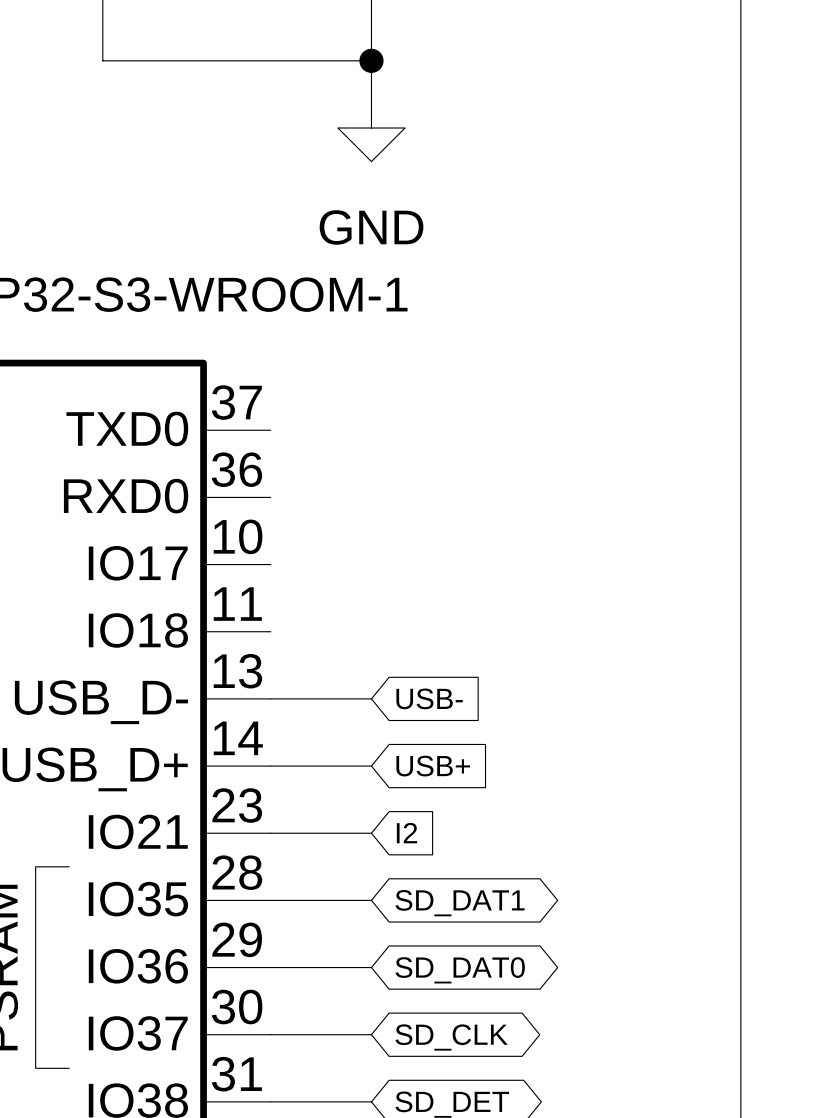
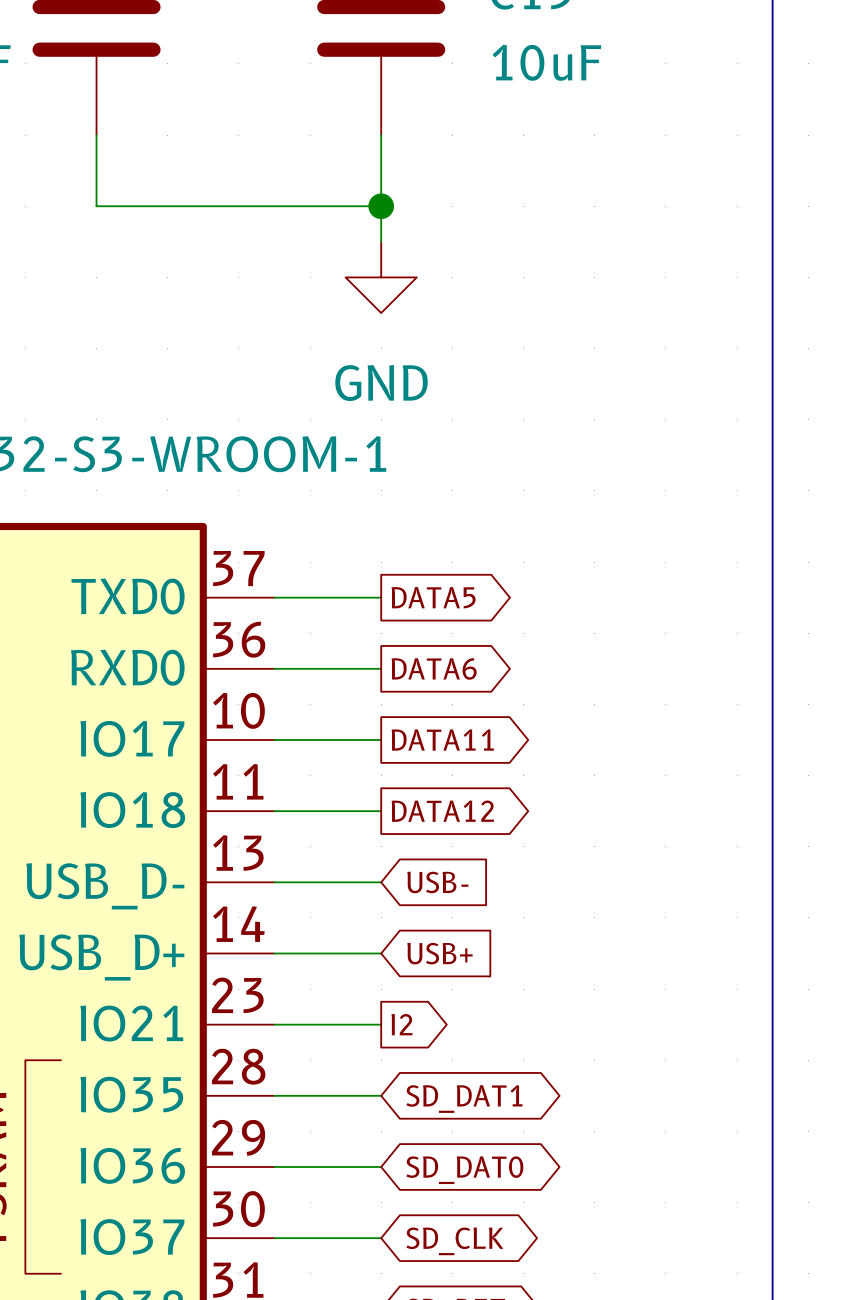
wire: none -> (274, 597) (381, 597)
global label: none -> DATA5 (433, 597)
wire: none -> (274, 668) (381, 668)
global label: none -> DATA6 (434, 668)
wire: none -> (274, 740) (381, 740)
global label: none -> DATA11 (442, 740)
wire: none -> (274, 811) (381, 811)
global label: none -> DATA12 (442, 811)
global label shape: input (406, 833) -> output (401, 1024)

